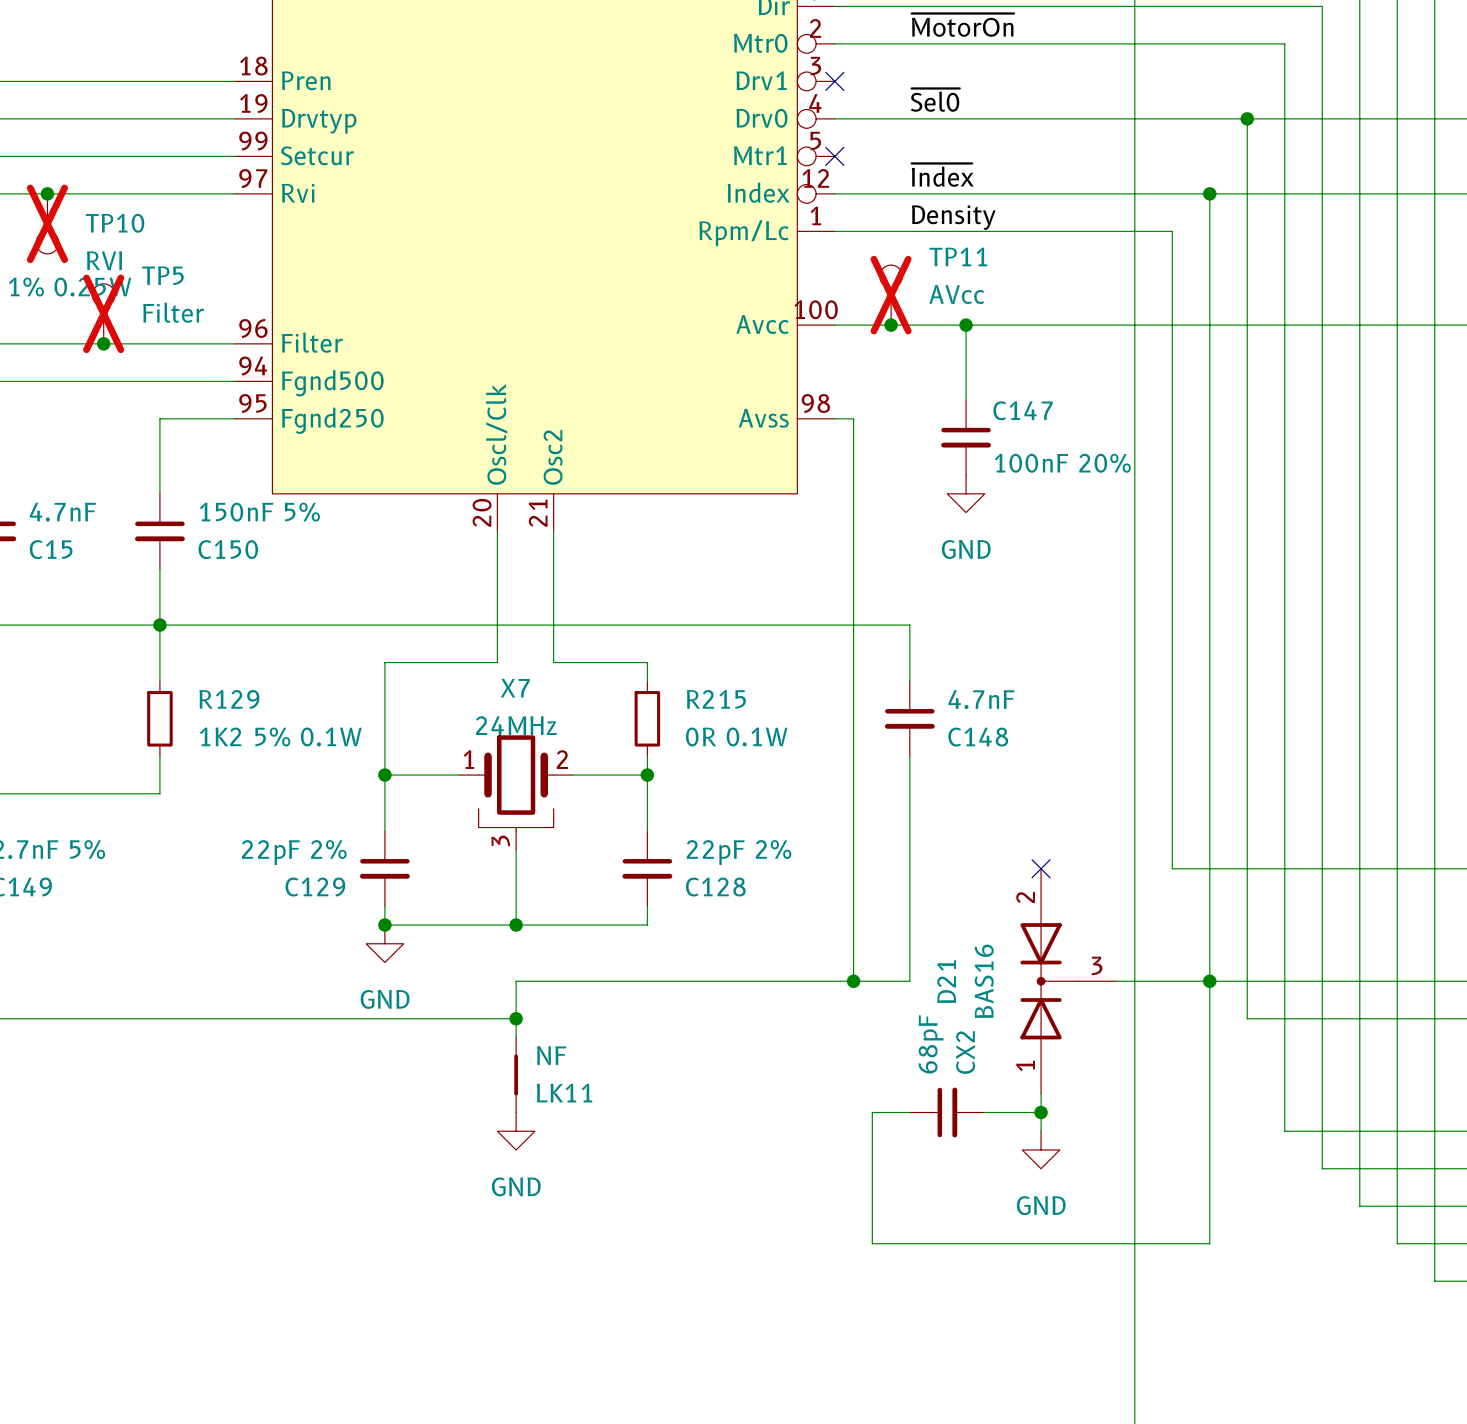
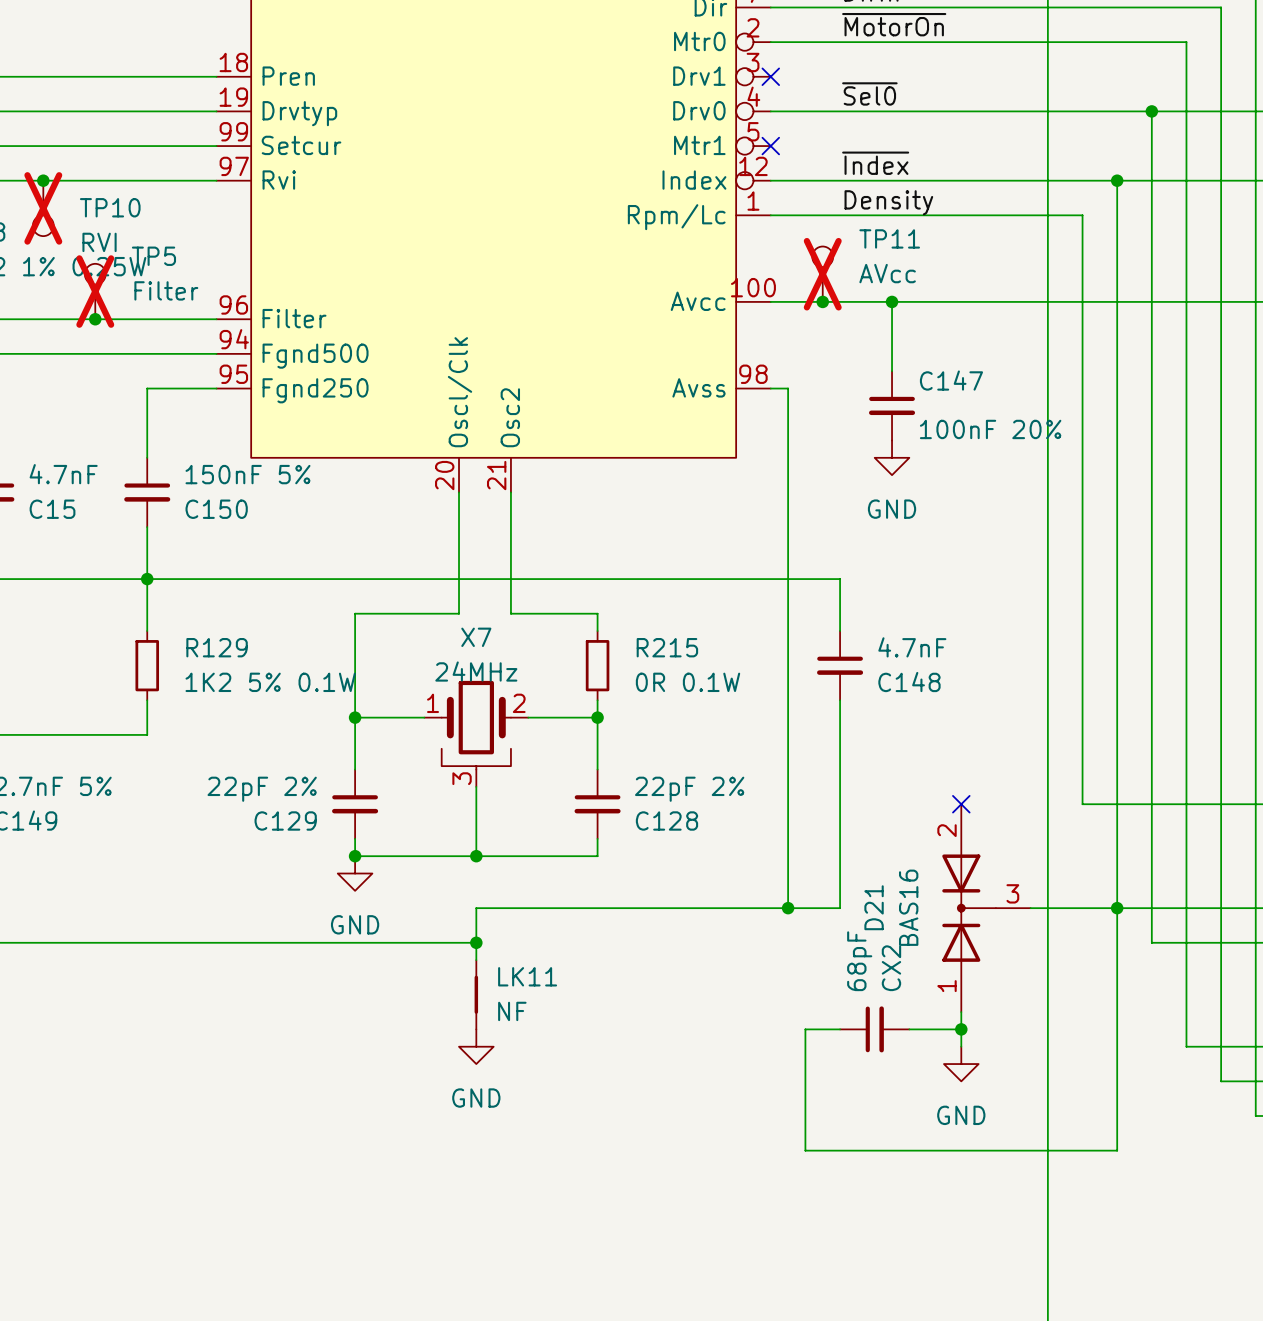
LK11 value position: NF (551, 1055) -> NF (512, 1011)
LK11 name position: LK11 (564, 1093) -> LK11 (527, 976)

